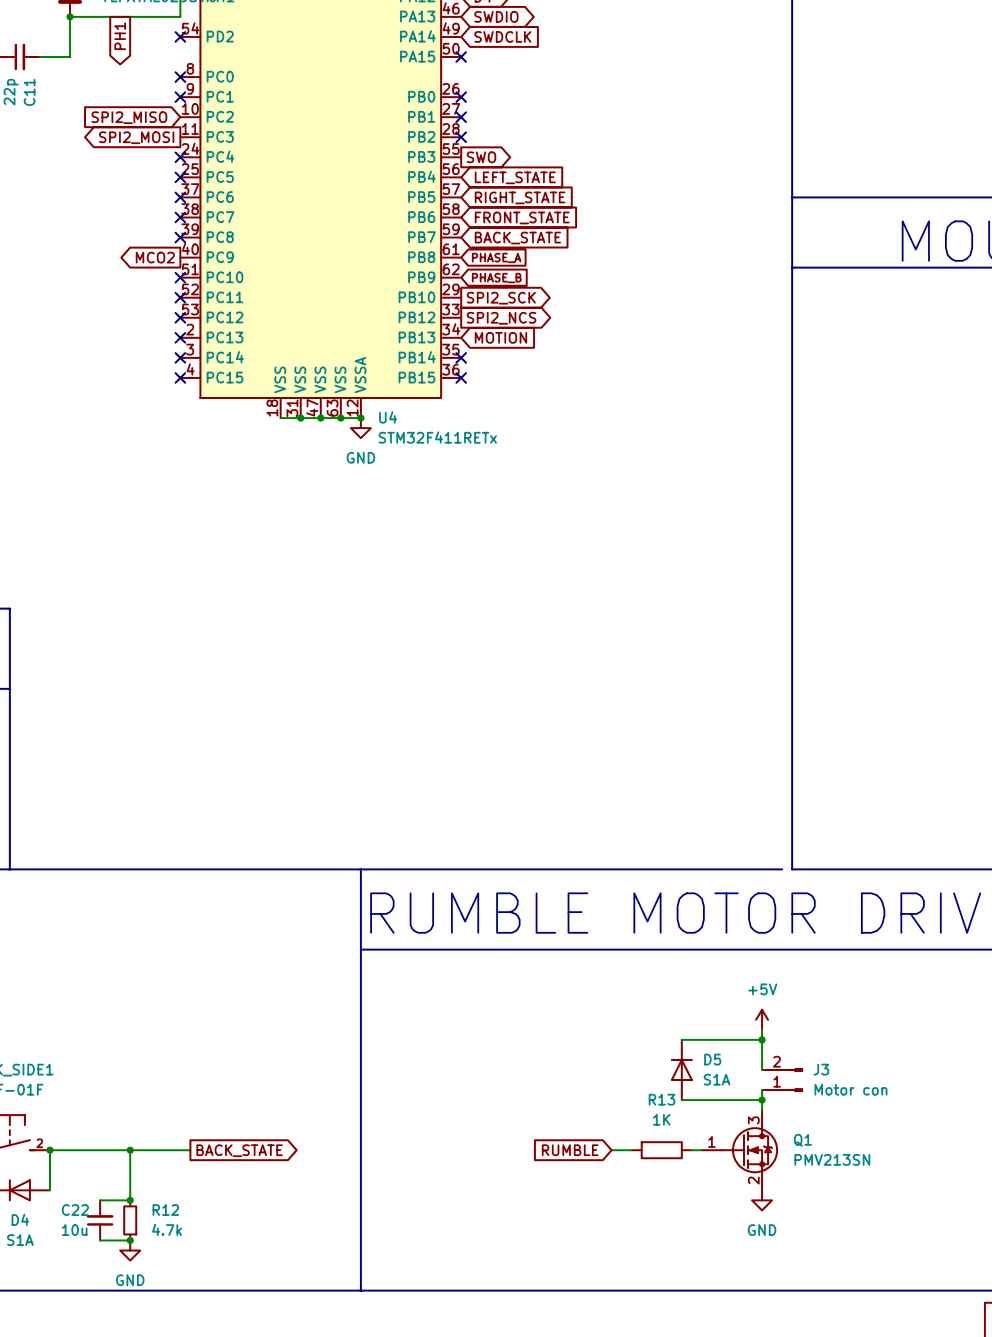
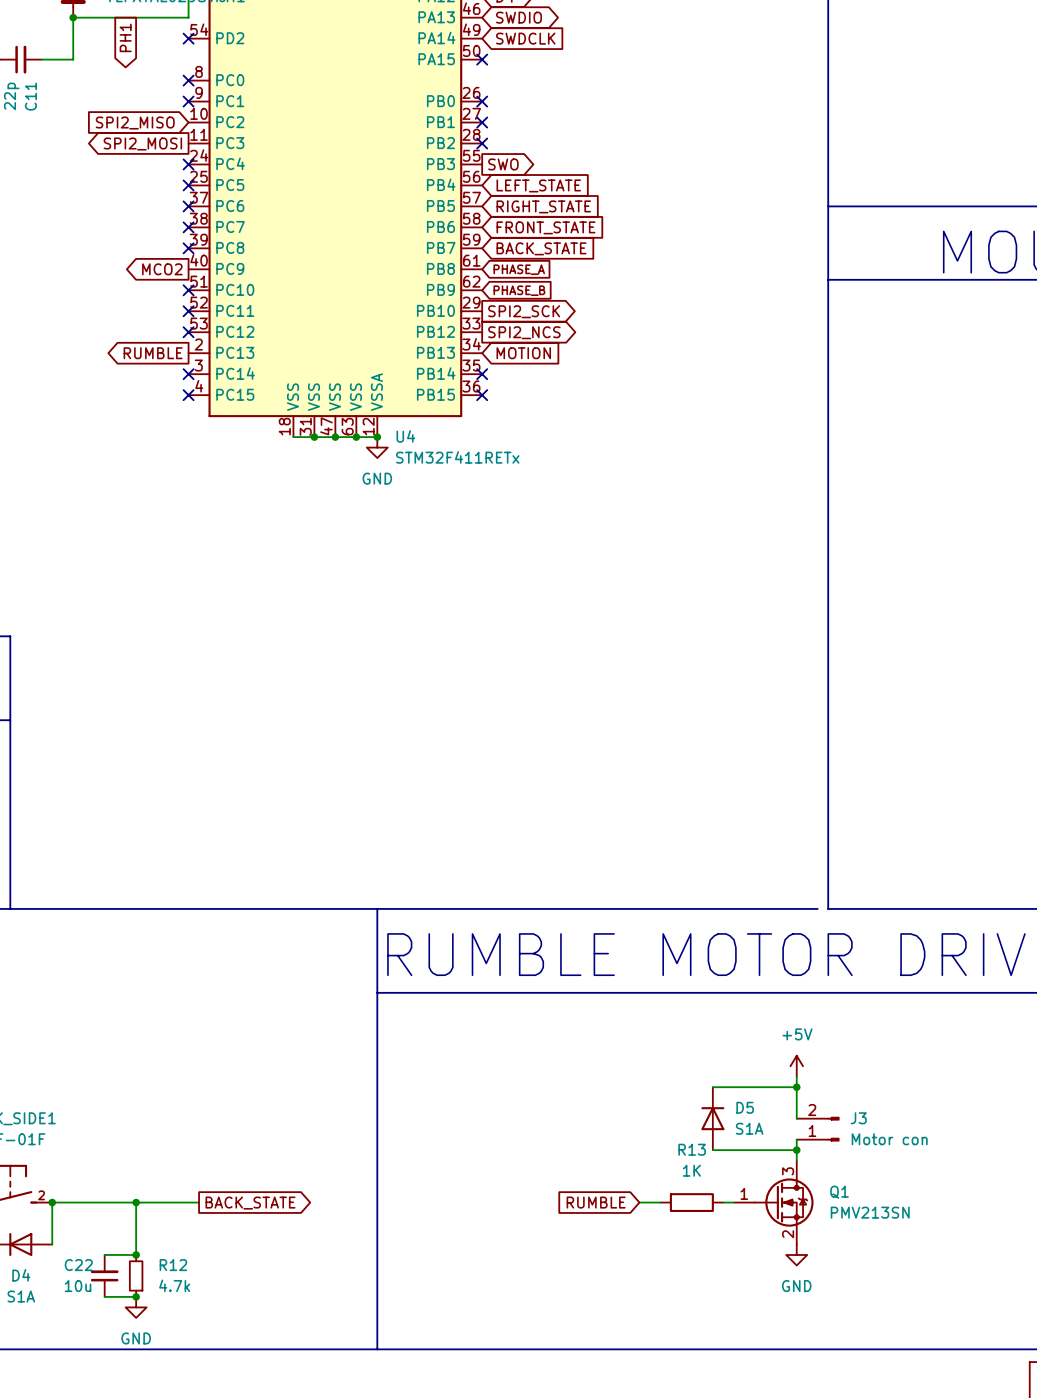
global label: none -> RUMBLE (153, 353)
no-connect mark: (180, 337) -> none

